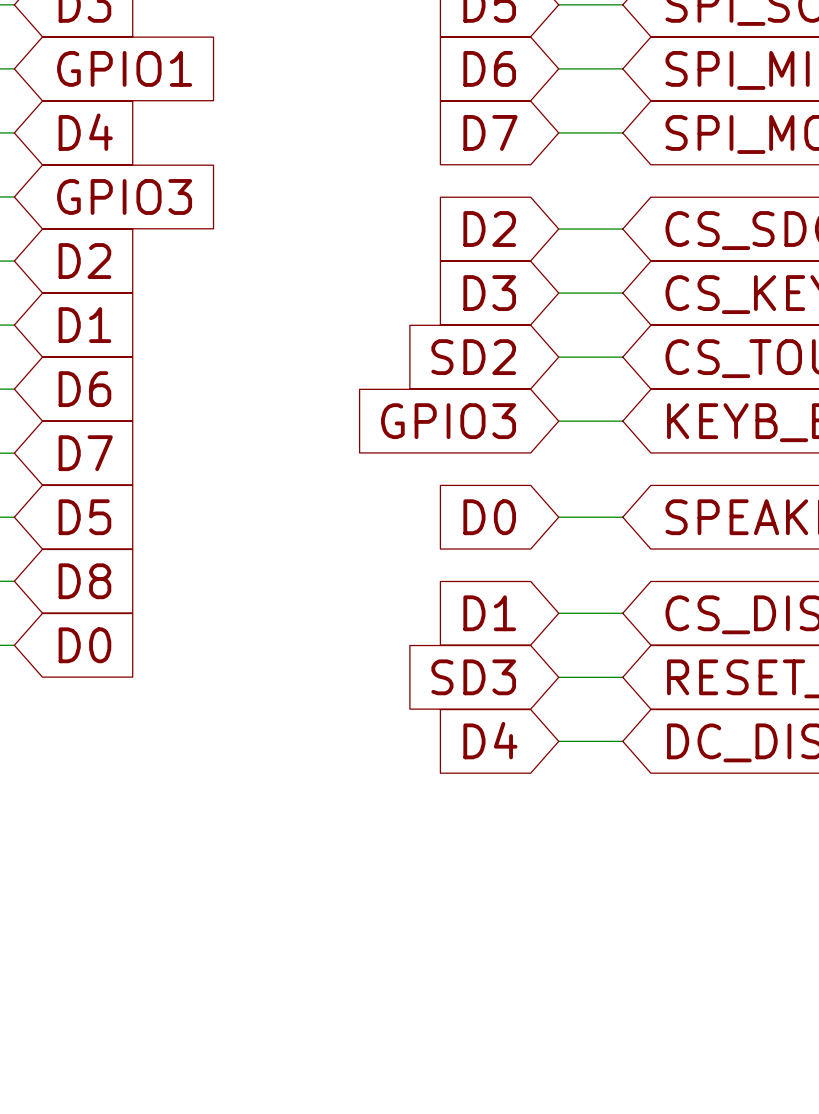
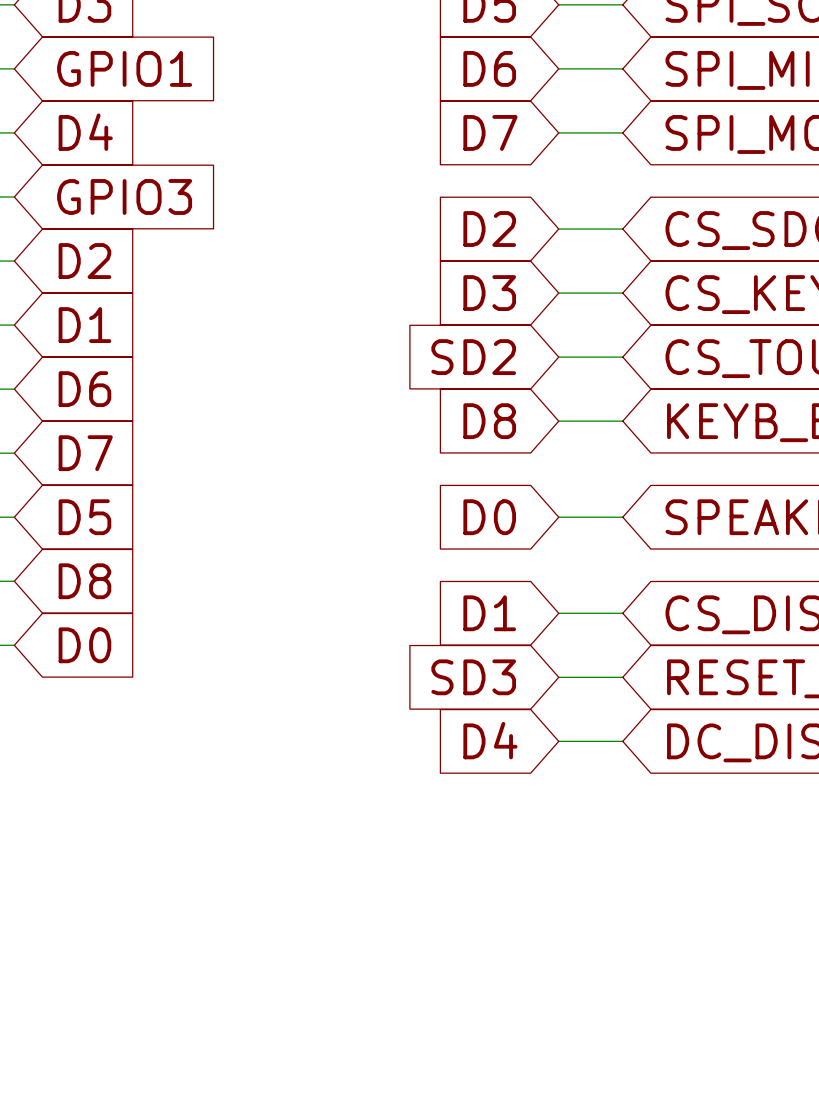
global label: GPIO3 (448, 421) -> D8 (489, 421)

